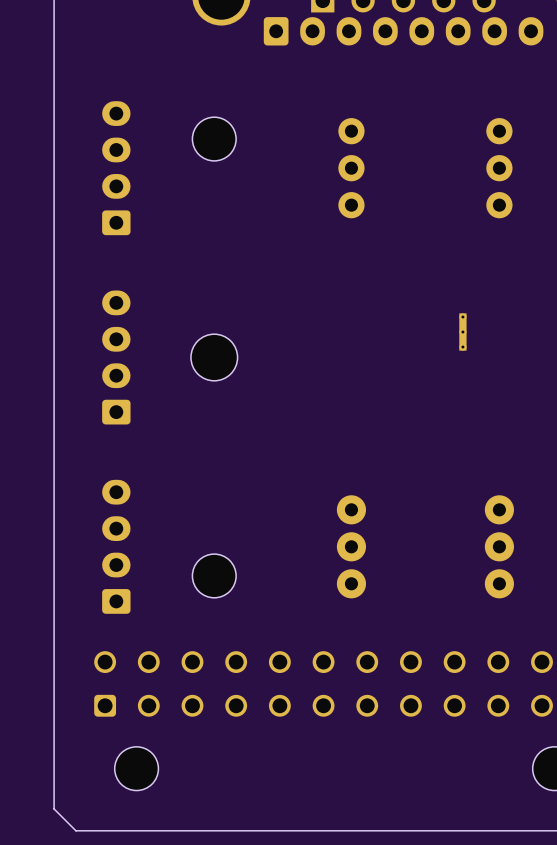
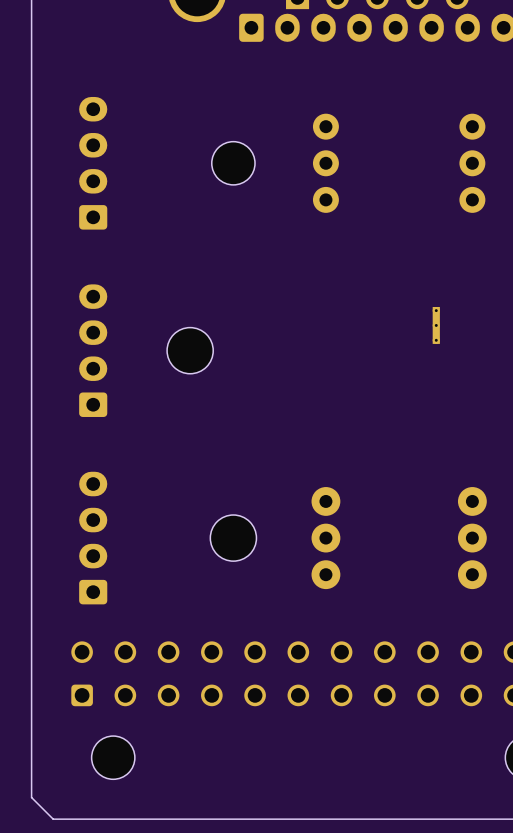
part position: (214, 139) -> (233, 163)
part: none -> (233, 538)
part: (214, 575) -> none

